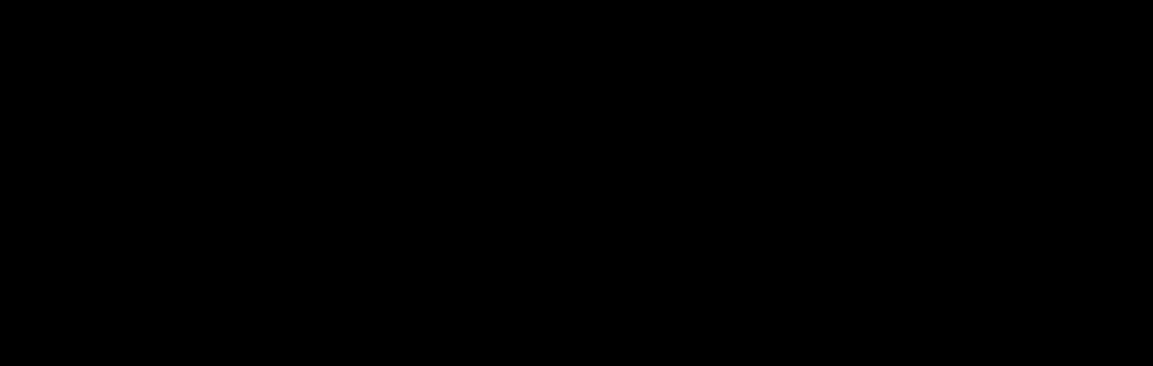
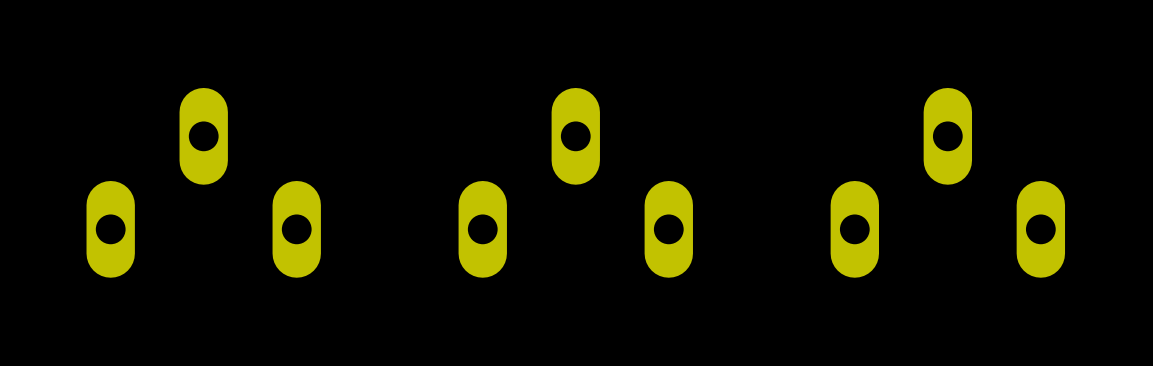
part: none -> (203, 182)
part: none -> (575, 182)
part: none -> (947, 182)

